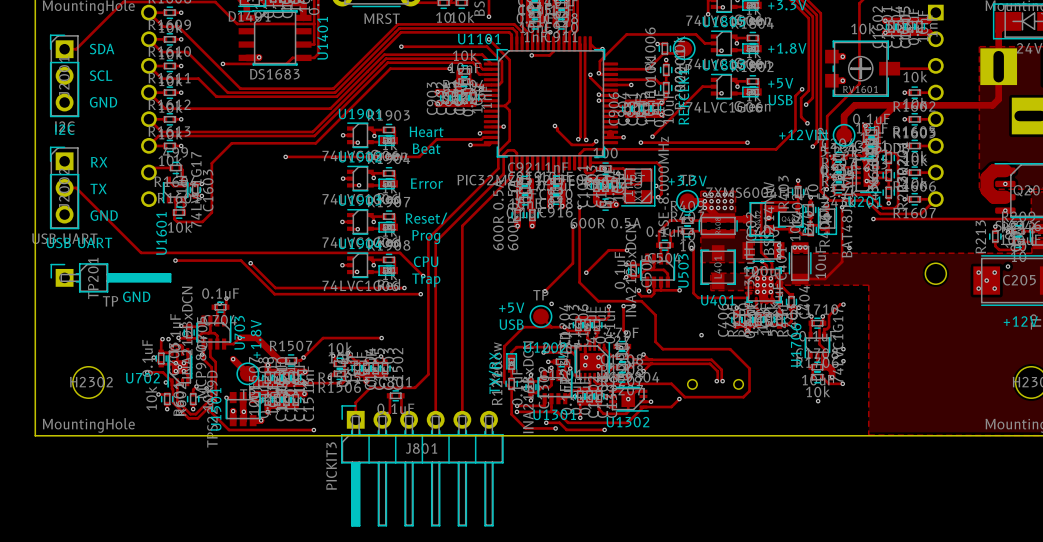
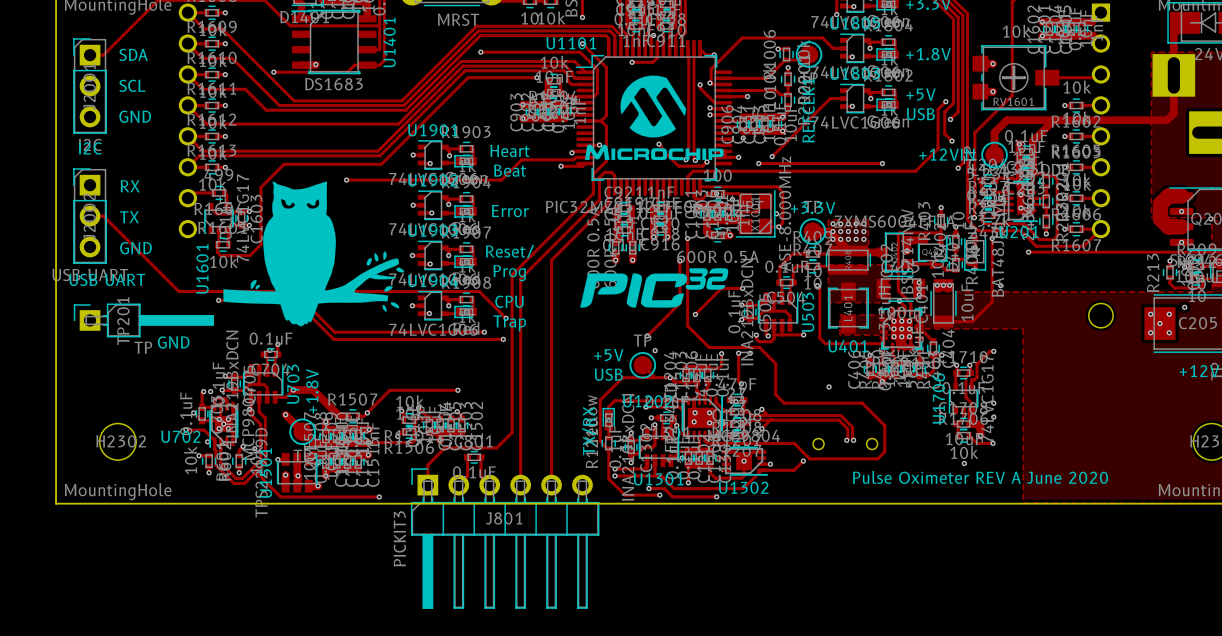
drawing: none -> [585, 75, 724, 161]
drawing: none -> [223, 181, 405, 327]
drawing: none -> [580, 268, 729, 308]
text: none -> Pulse Oximeter REV A June 2020 (980, 477)

